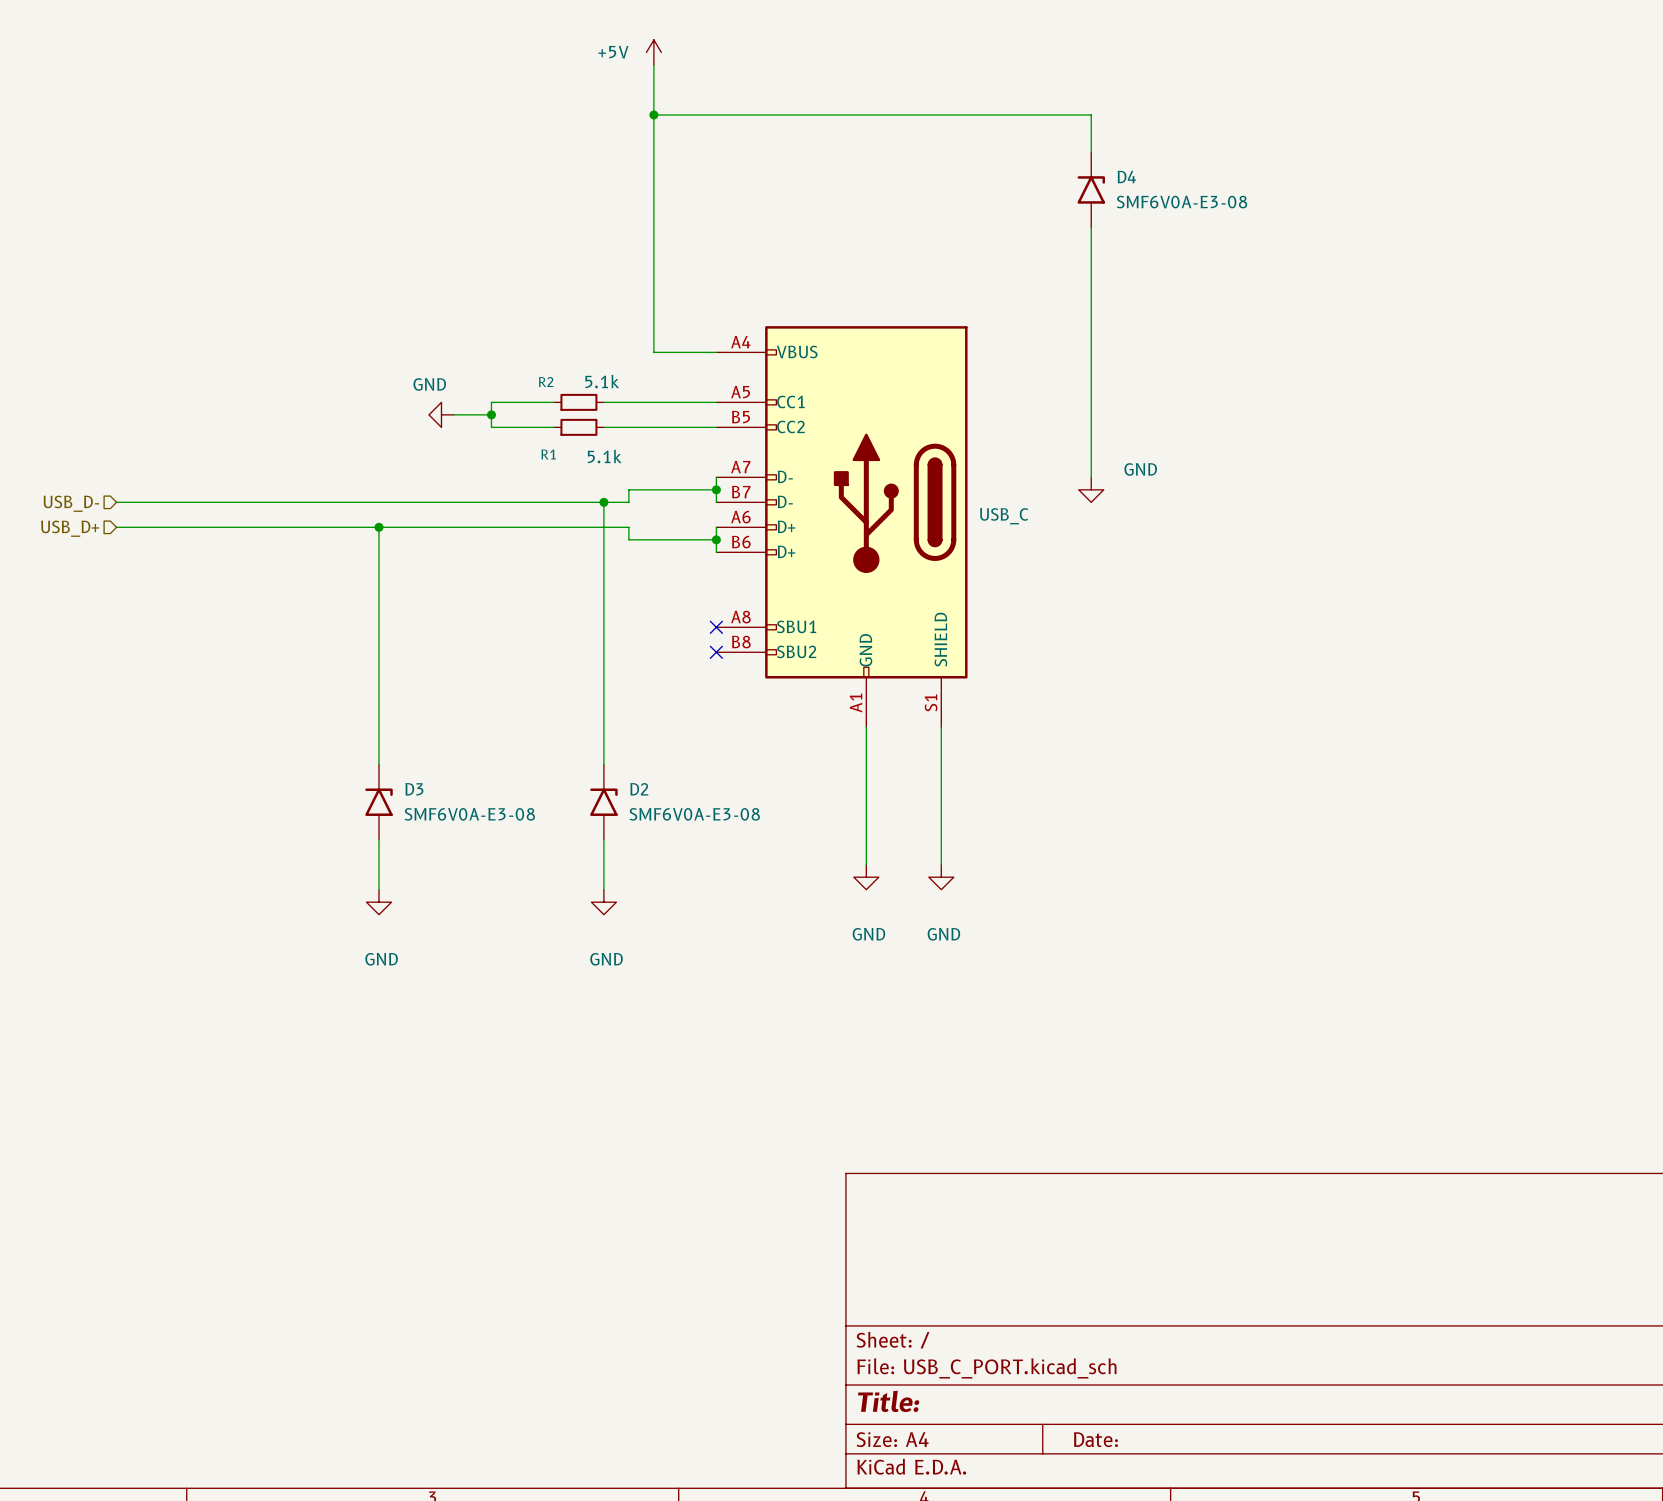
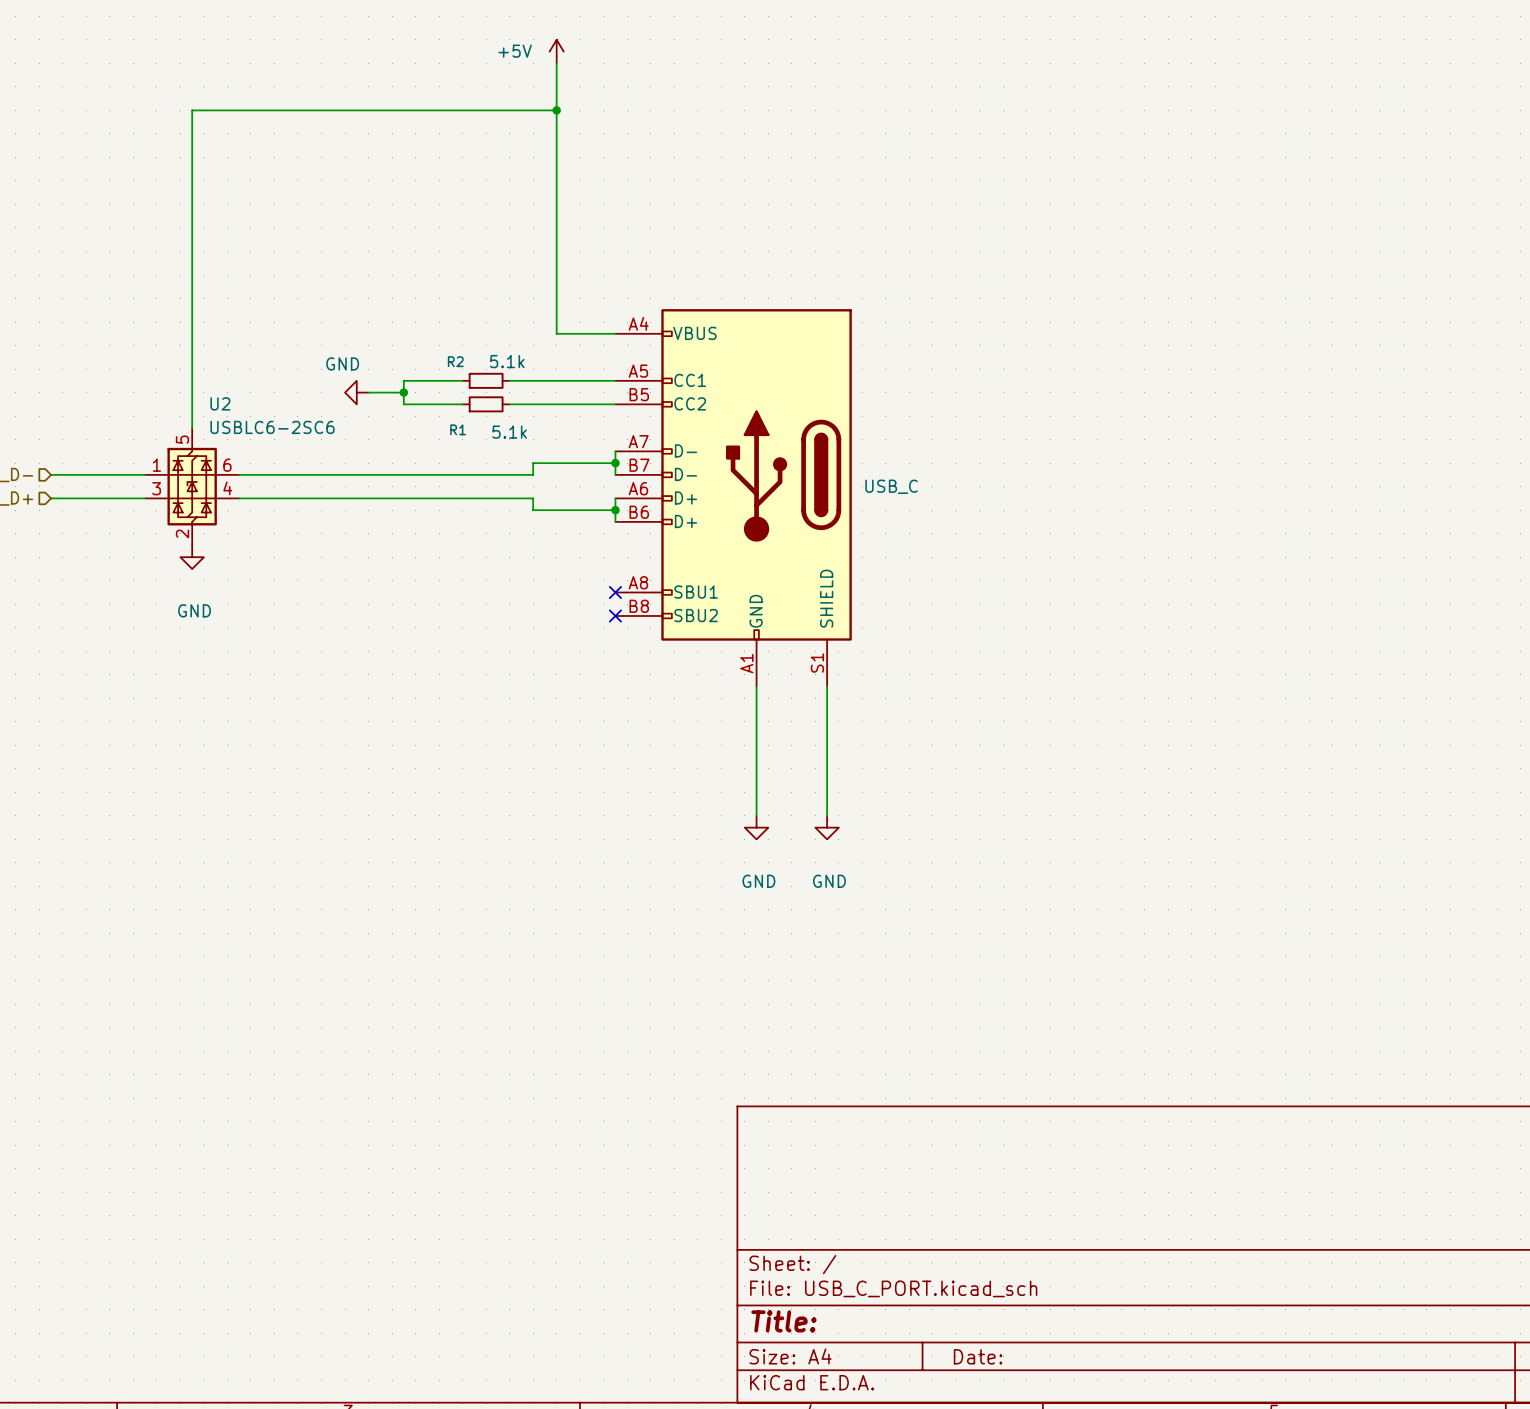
wire: (653, 114) (1091, 114) (1091, 152) -> (556, 110) (192, 110) (192, 427)
D4: SMF6V0A-E3-08 (1091, 189) -> none
wire: (1091, 227) (1091, 477) -> none
power symbol: GND (1091, 489) -> none
wire: (603, 502) (603, 764) -> none
junction: (603, 502) -> none
U2: none -> USBLC6-2SC6 (192, 486)
wire: (379, 527) (379, 764) -> none
junction: (379, 527) -> none
power symbol: none -> GND (192, 557)
D3: SMF6V0A-E3-08 (379, 802) -> none
D2: SMF6V0A-E3-08 (603, 802) -> none
wire: (379, 839) (379, 889) -> none
wire: (603, 839) (603, 889) -> none
power symbol: GND (379, 902) -> none
power symbol: GND (603, 902) -> none

